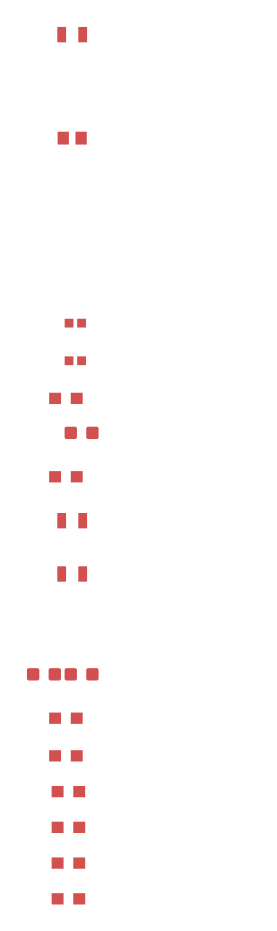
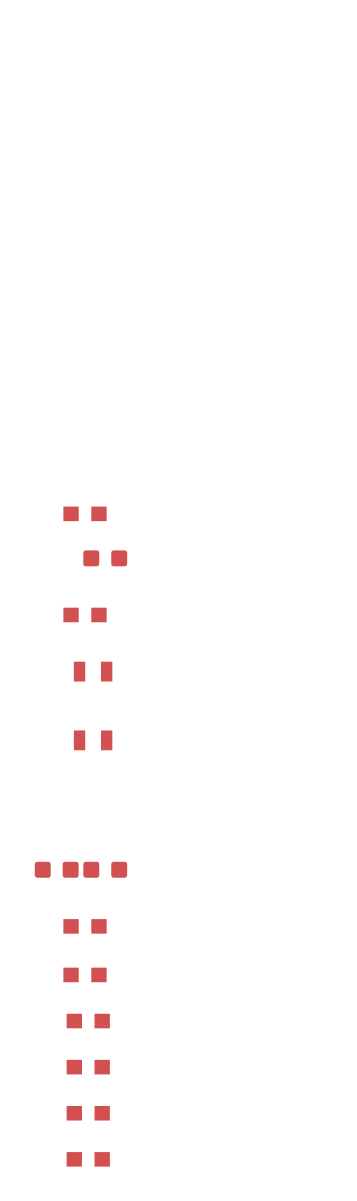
part: (72, 34) -> none
part: (72, 138) -> none
part: (75, 323) -> none
part: (75, 360) -> none

